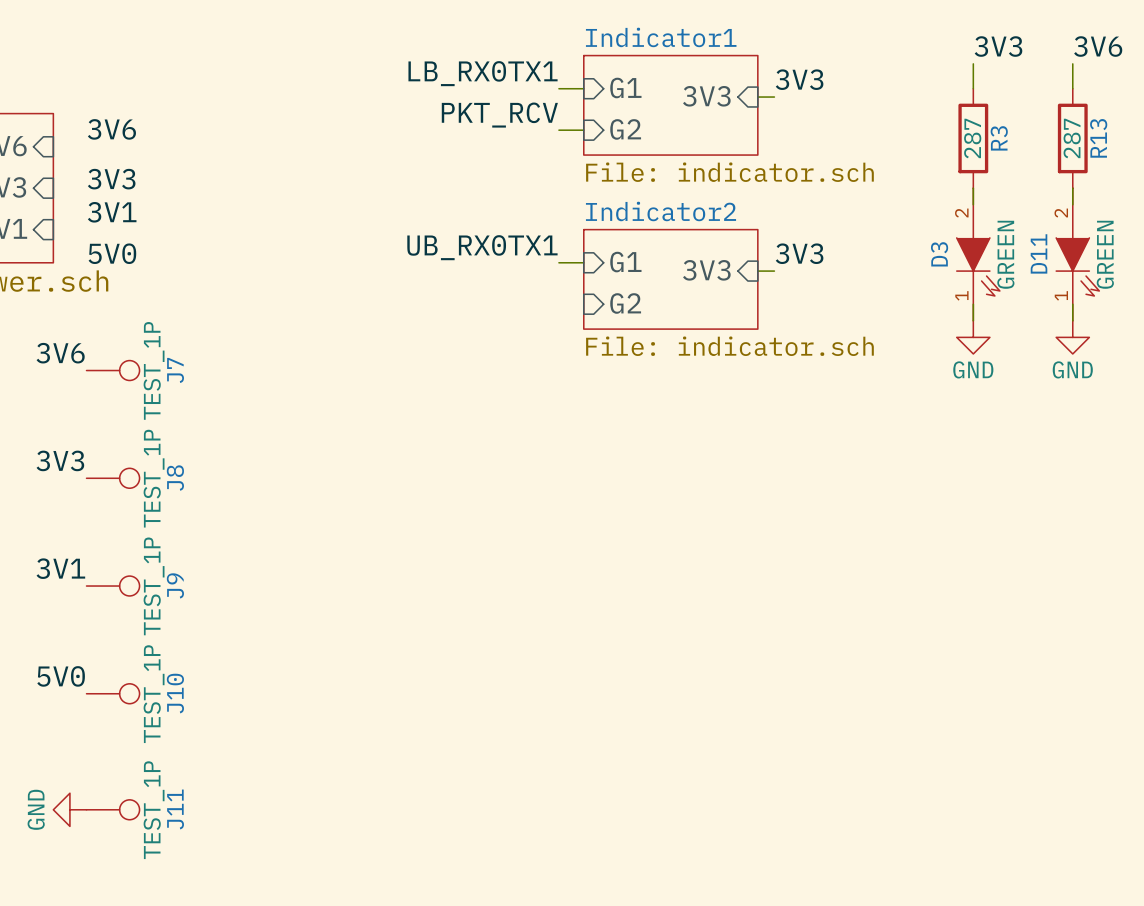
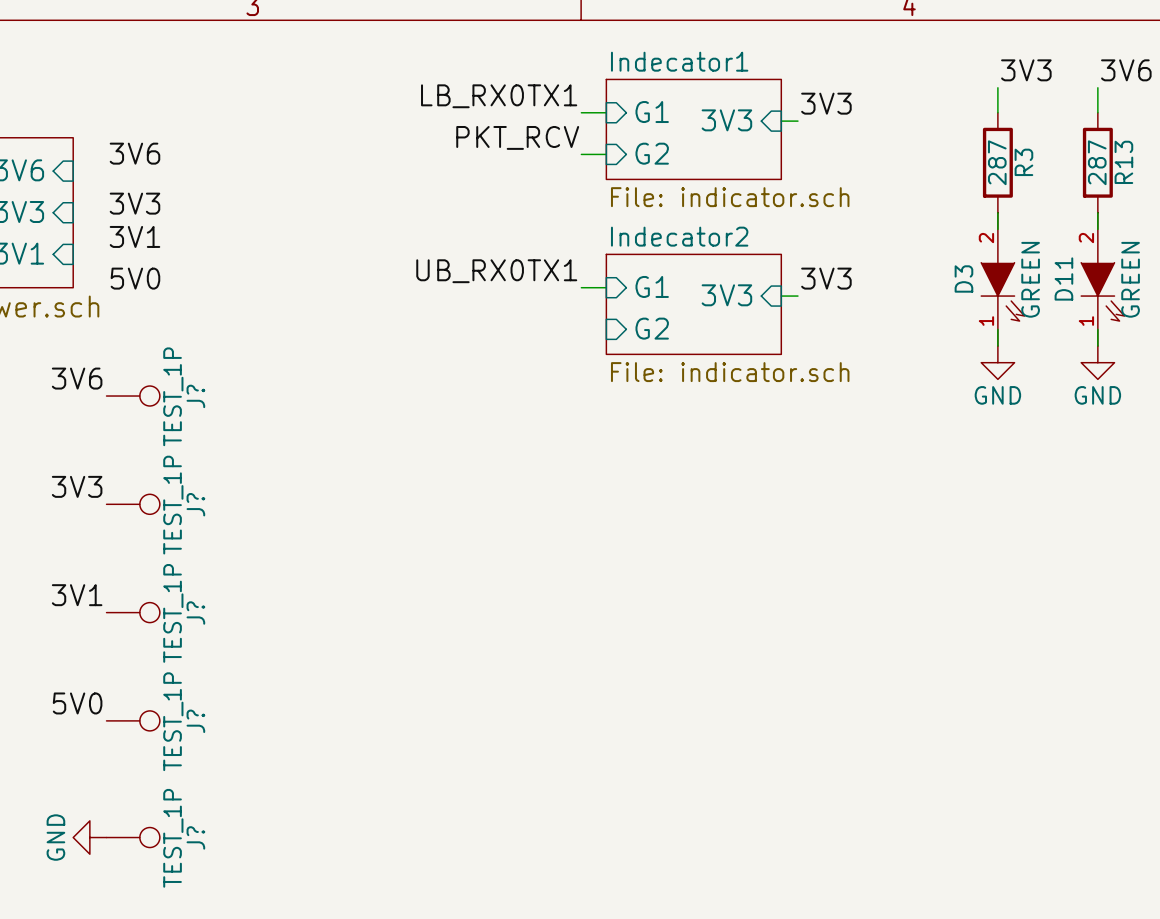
sheet Indicator1 name: Indicator1 (661, 37) -> Indecator1 (679, 61)
sheet Indicator2 name: Indicator2 (661, 211) -> Indecator2 (679, 236)
J7 name: J7 (175, 370) -> J? (195, 396)
J8 name: J8 (175, 478) -> J? (195, 504)
J9 name: J9 (175, 585) -> J? (195, 613)
J10 name: J10 (175, 693) -> J? (195, 721)
J11 name: J11 (175, 809) -> J? (195, 837)

